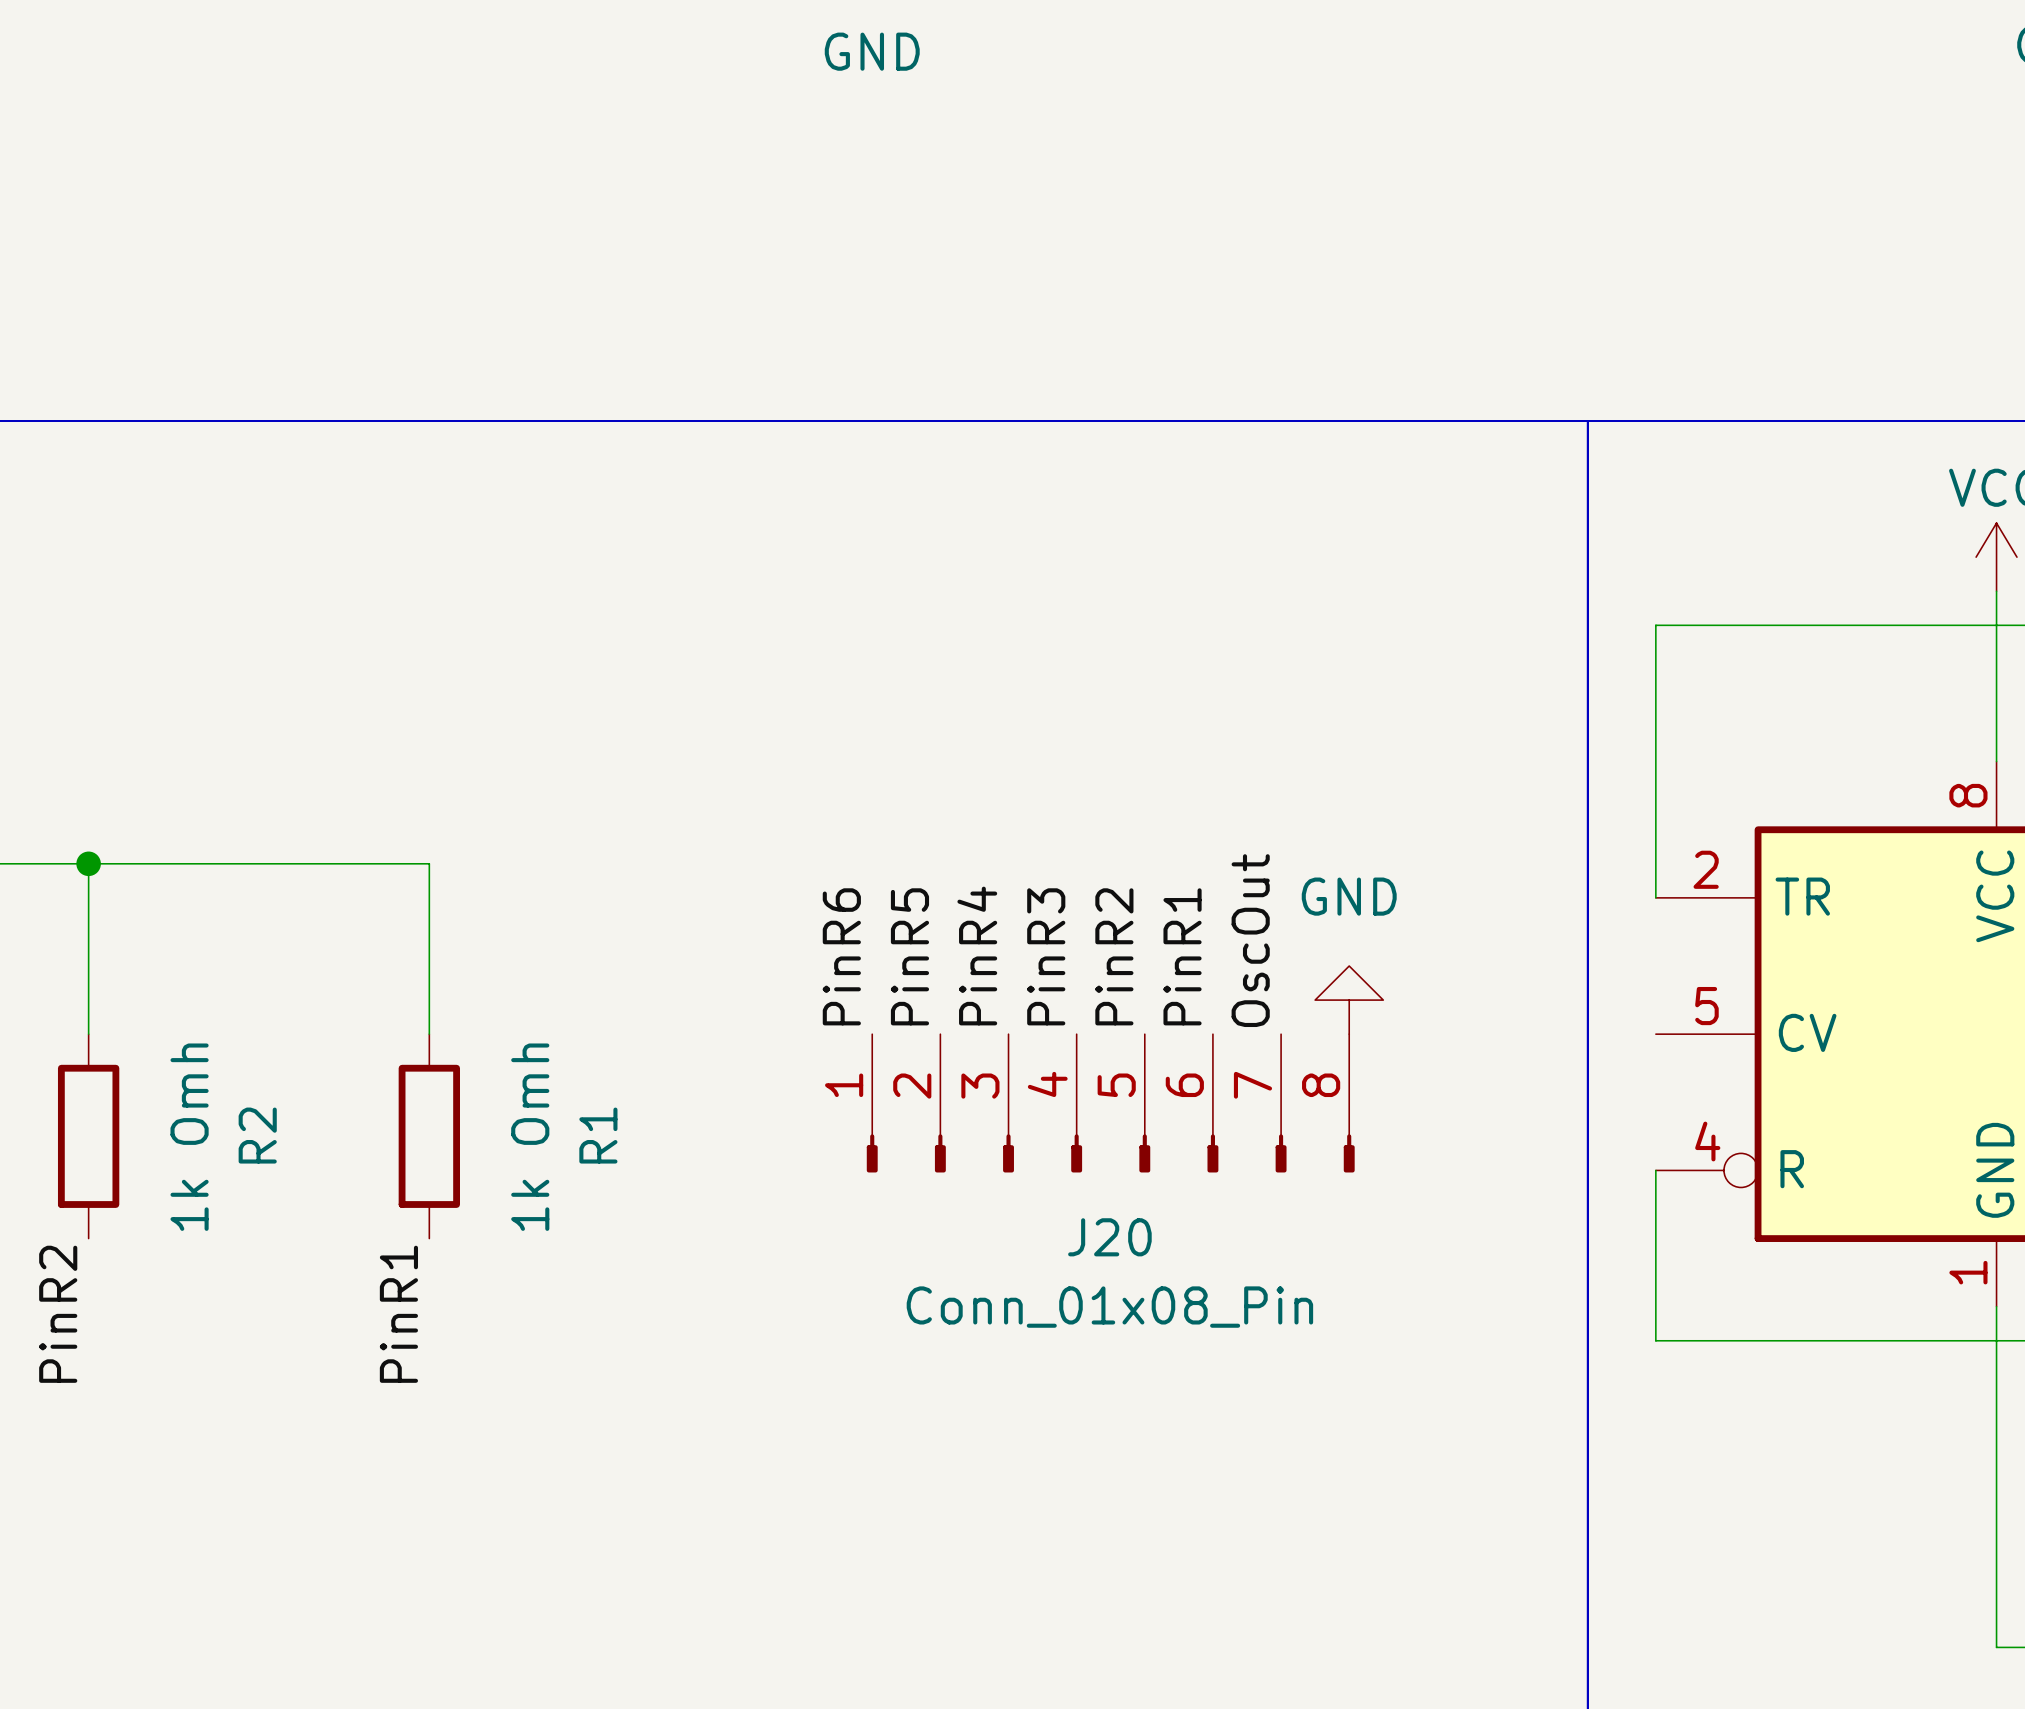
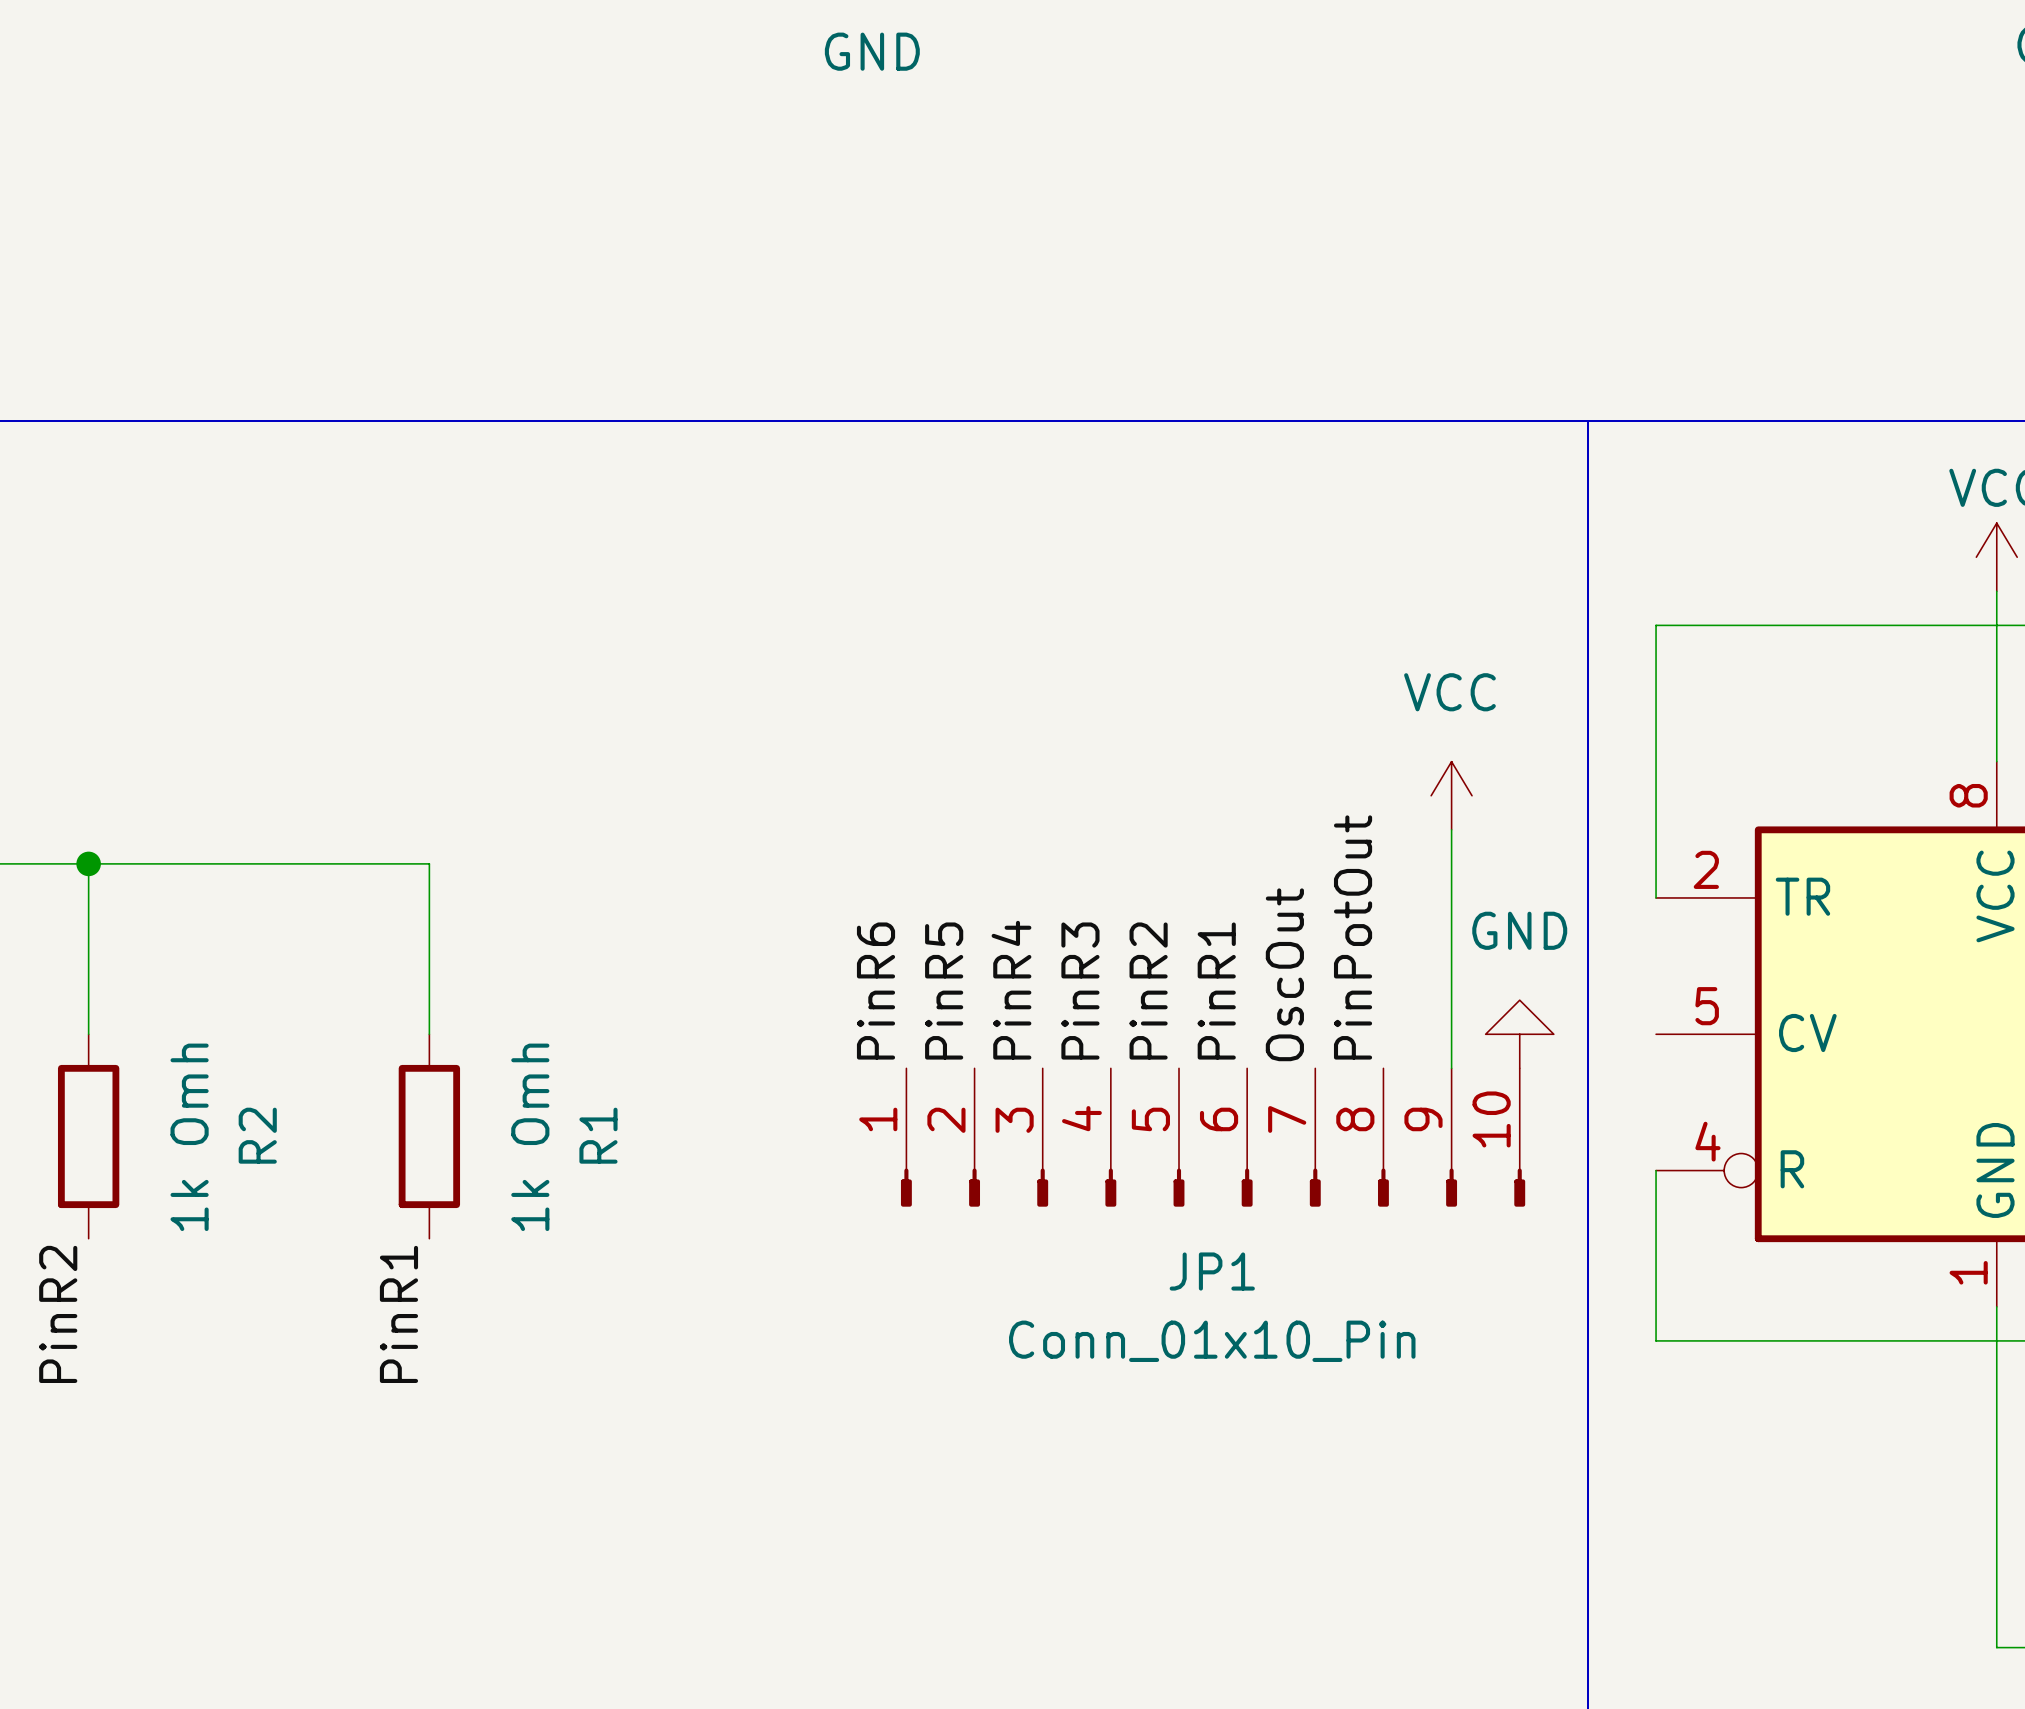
power symbol: none -> VCC (1451, 795)
wire: none -> (1451, 829) (1451, 1068)
label: none -> PinPotOut (1353, 937)
label position: OscOut (1250, 940) -> OscOut (1284, 974)
label position: PinR6 (841, 956) -> PinR6 (876, 991)
label position: PinR5 (909, 956) -> PinR5 (944, 991)
label position: PinR4 (977, 956) -> PinR4 (1011, 990)
label position: PinR3 (1046, 956) -> PinR3 (1080, 991)
label position: PinR2 (1114, 956) -> PinR2 (1148, 991)
label position: PinR1 (1182, 956) -> PinR1 (1216, 991)
power symbol position: GND (1349, 1000) -> GND (1519, 1034)
J20: Conn_01x08_Pin (1110, 1103) -> none
JP1: none -> Conn_01x10_Pin (1213, 1137)

